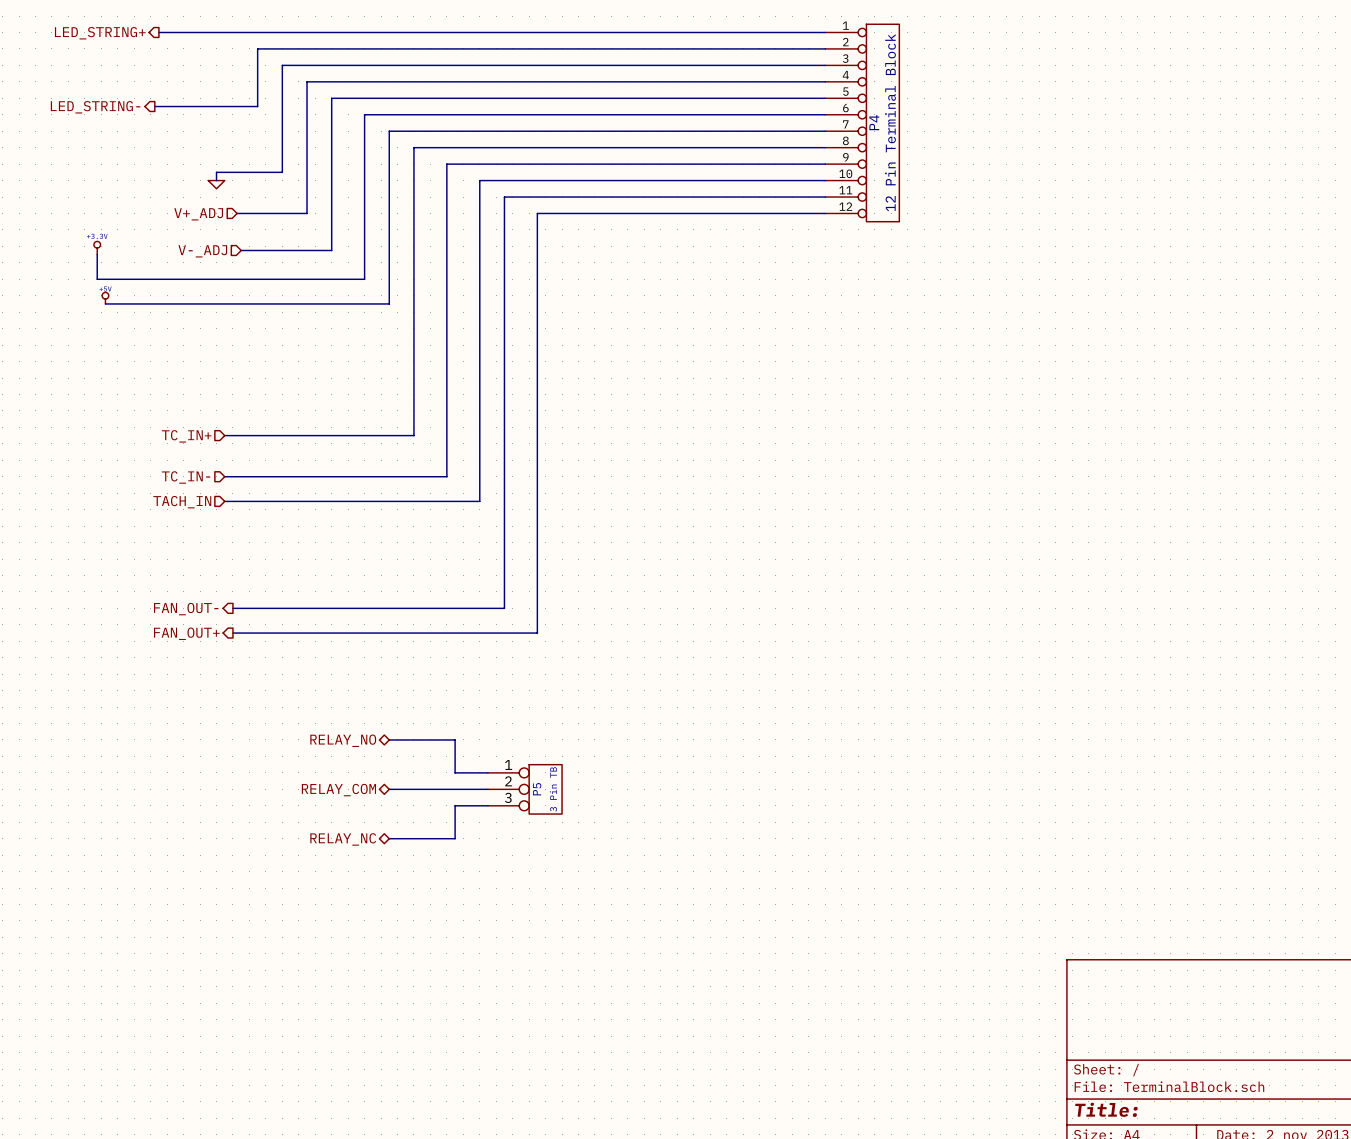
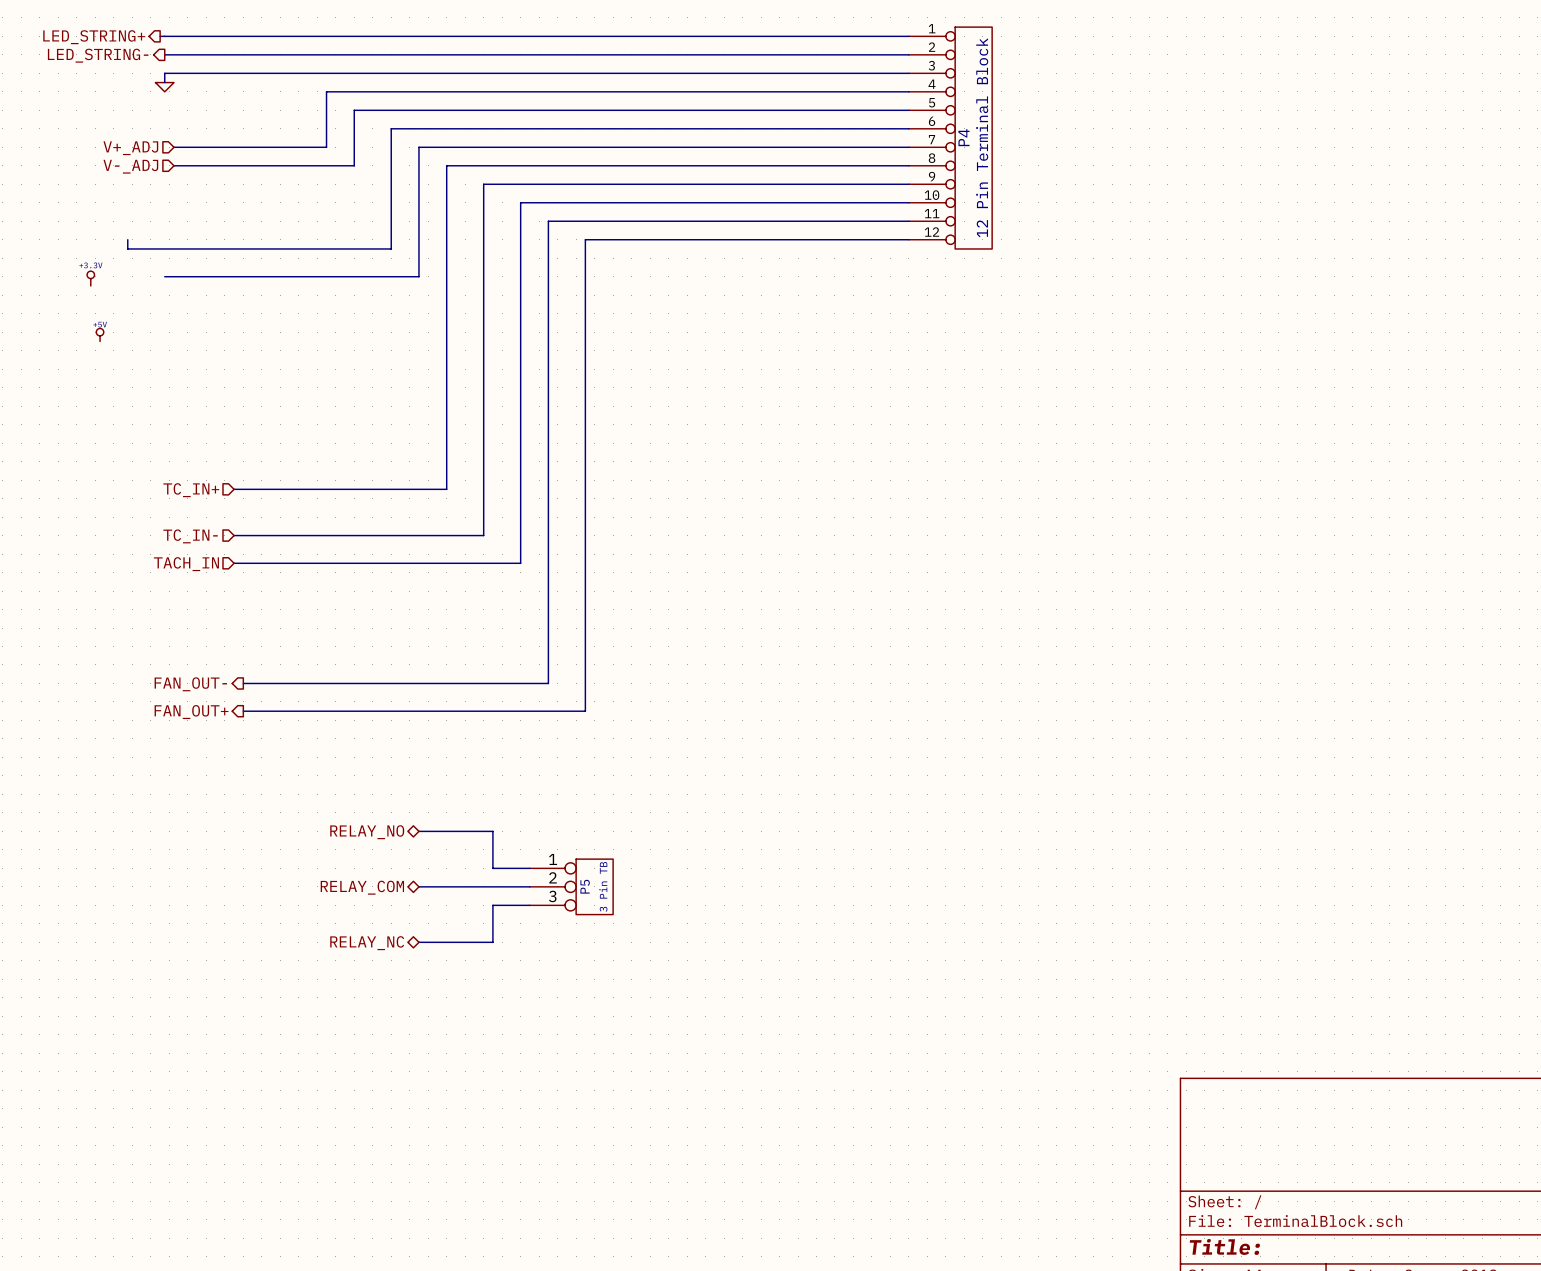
wire: (257, 48) (257, 106) (154, 106) -> (271, 54) (164, 54)
wire: (282, 65) (282, 172) (216, 172) (216, 180) -> (298, 73) (164, 73) (164, 82)
hierarchical label position: LED_STRING- (95, 107) -> LED_STRING- (98, 55)
wire: (307, 131) (307, 213) (237, 213) -> (326, 147) (173, 147)
wire: (331, 147) (331, 250) (241, 250) -> (354, 165) (173, 165)
power symbol position: (216, 184) -> (164, 87)
hierarchical label position: V+_ADJ (198, 214) -> V+_ADJ (130, 148)
wire: (364, 221) (364, 279) (97, 279) (97, 254) -> (391, 248) (127, 248) (127, 239)
wire: (389, 246) (389, 303) (105, 303) -> (418, 276) (164, 276)
hierarchical label position: V-_ADJ (202, 251) -> V-_ADJ (130, 166)

